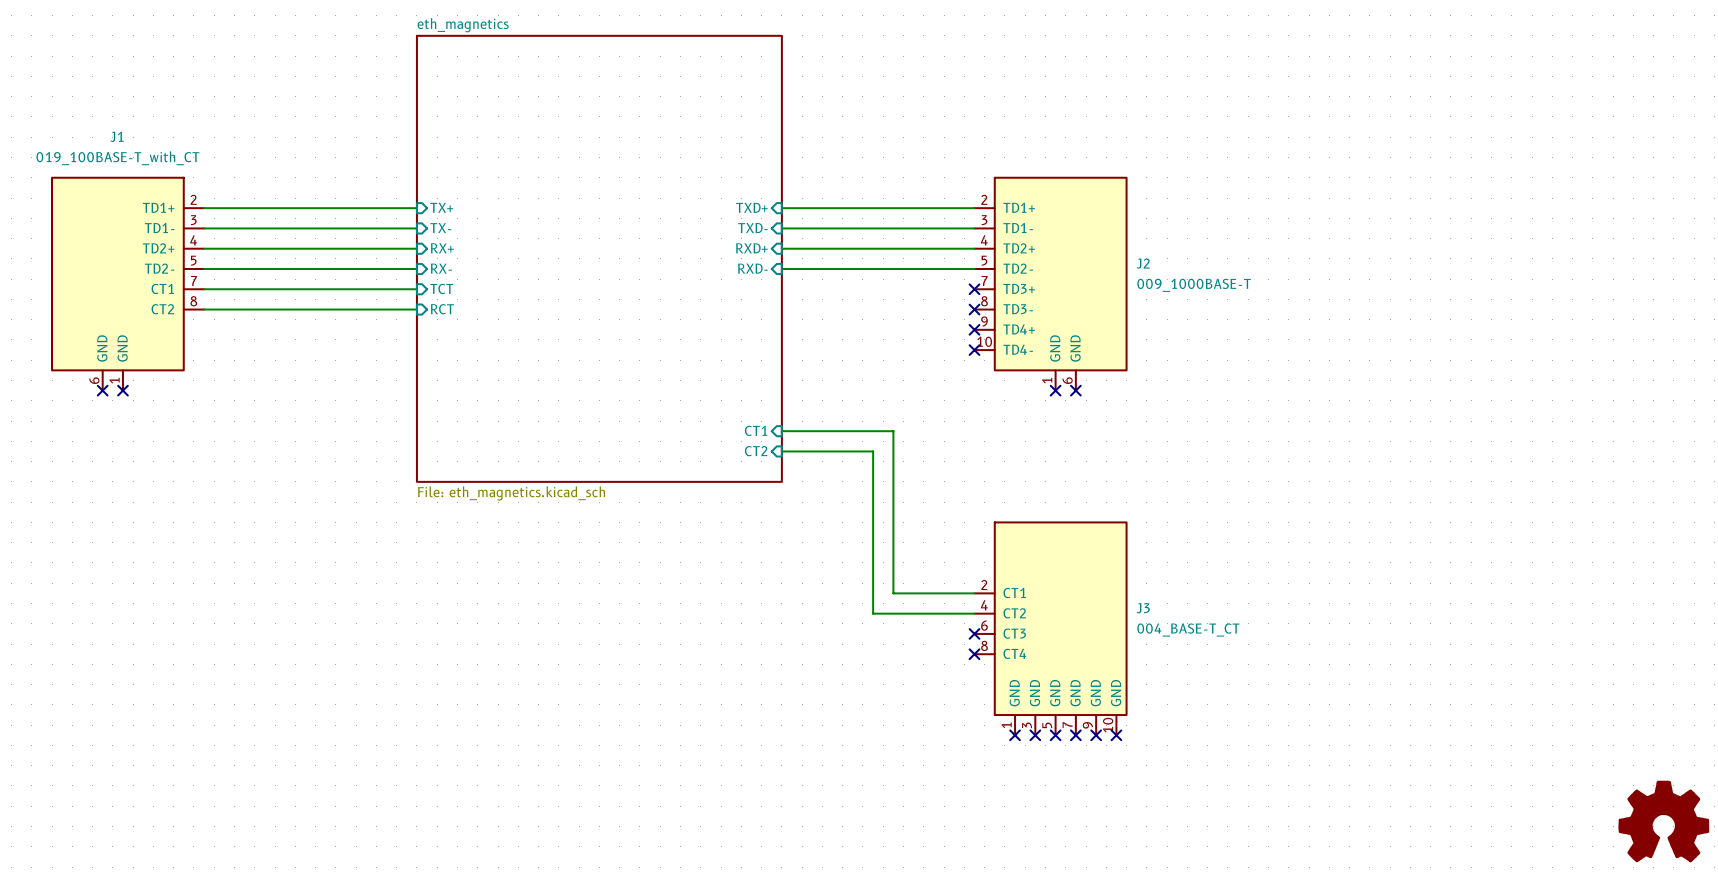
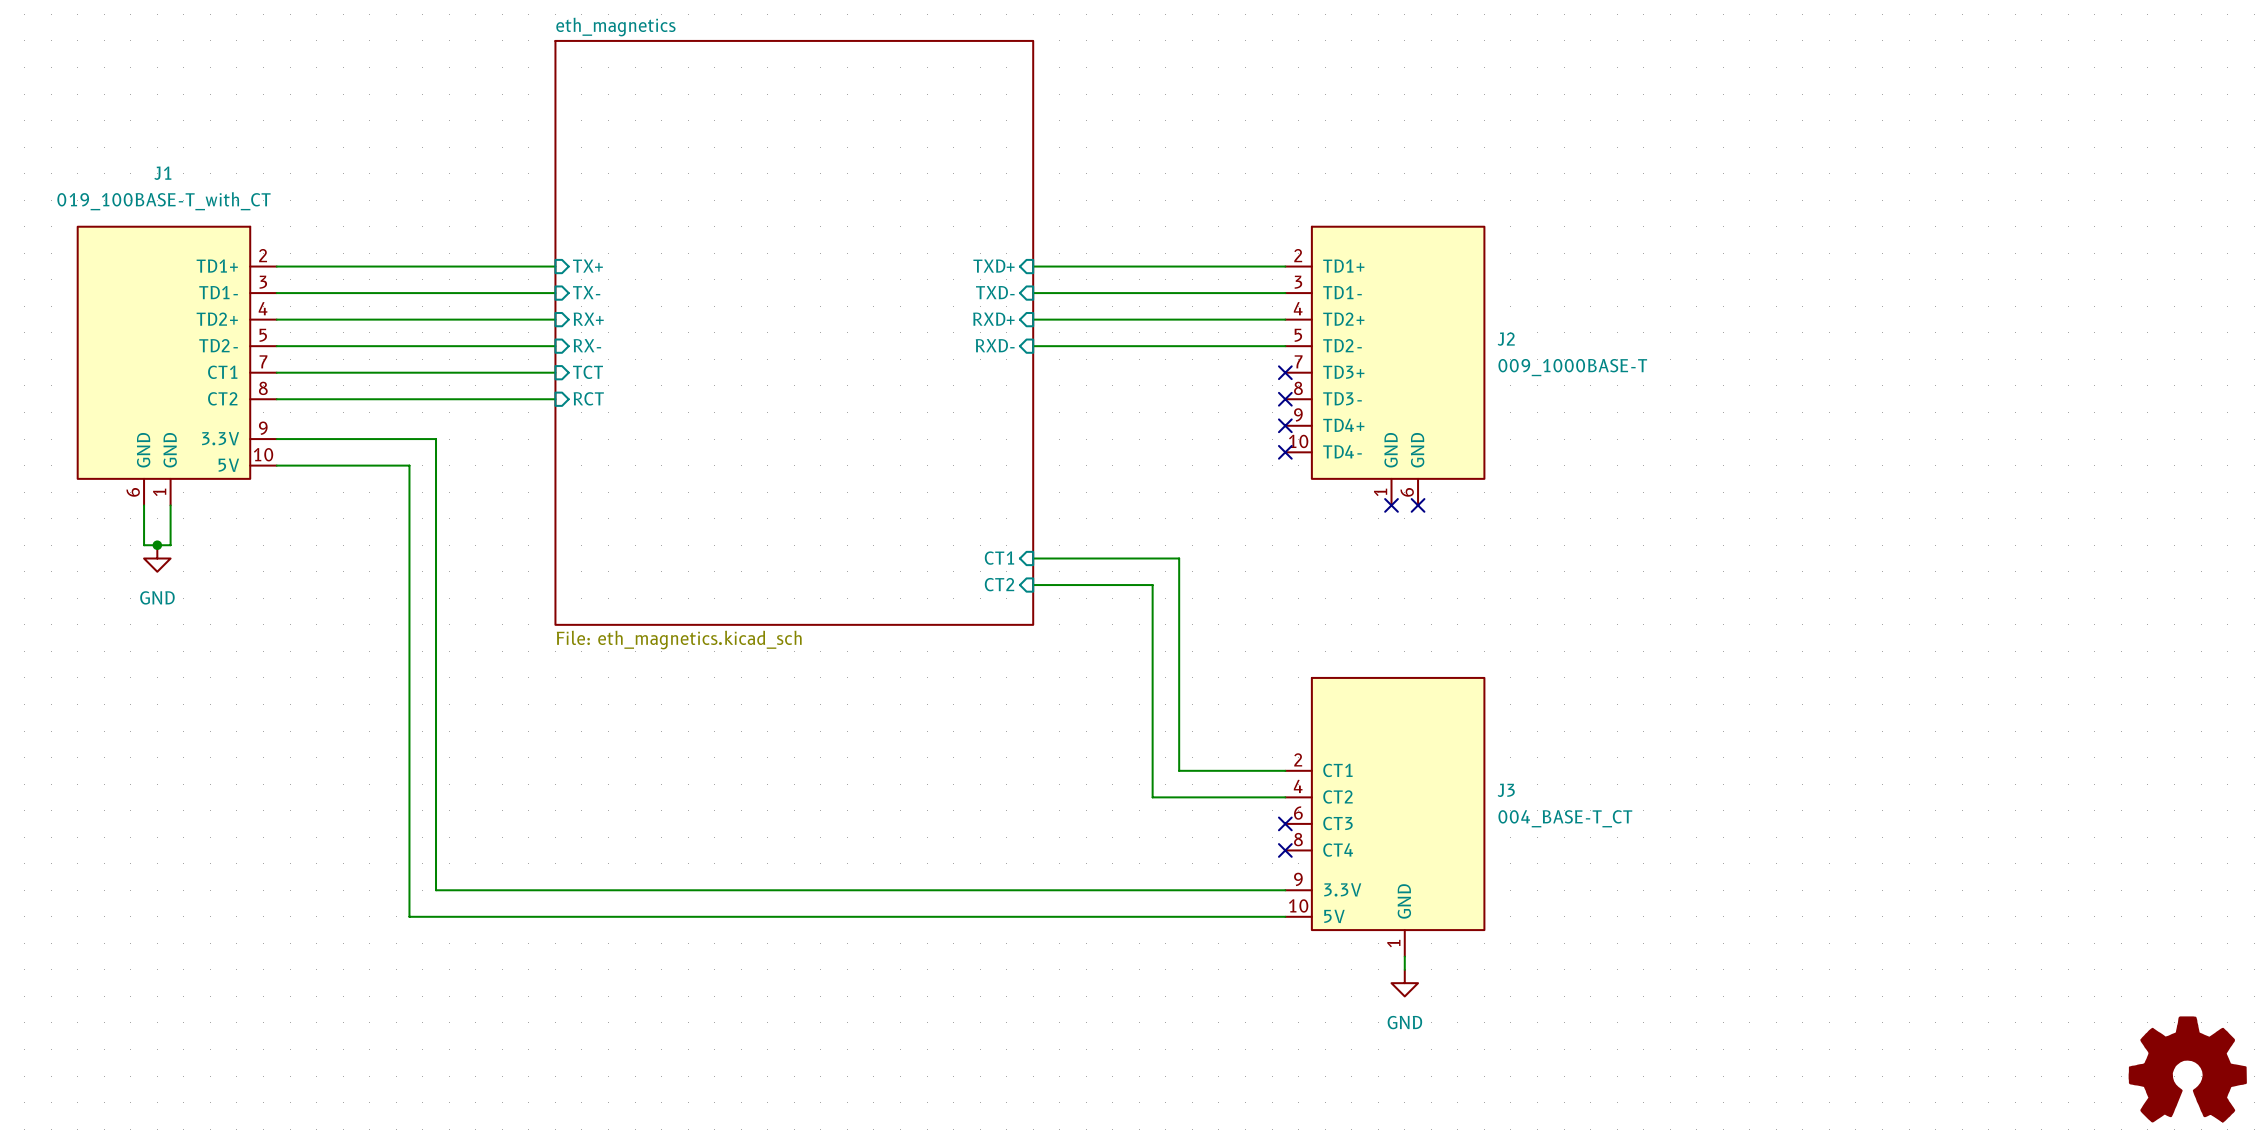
J1 symbol: [52, 177, 205, 391] -> [77, 226, 277, 506]
wire: none -> (276, 439) (436, 439) (436, 890) (1285, 890)
wire: none -> (276, 465) (409, 465) (409, 916) (1285, 916)
wire: none -> (144, 505) (144, 545) (170, 545) (170, 505)
no-connect mark: (102, 390) -> none
no-connect mark: (122, 390) -> none
junction: none -> (157, 545)
power symbol: none -> GND (157, 558)
J3 symbol: [974, 522, 1127, 736] -> [1285, 677, 1485, 957]
no-connect mark: (1015, 735) -> none
no-connect mark: (1035, 735) -> none
no-connect mark: (1055, 735) -> none
wire: none -> (1404, 956) (1404, 969)
no-connect mark: (1075, 735) -> none
no-connect mark: (1096, 735) -> none
no-connect mark: (1116, 735) -> none
power symbol: none -> GND (1404, 983)

